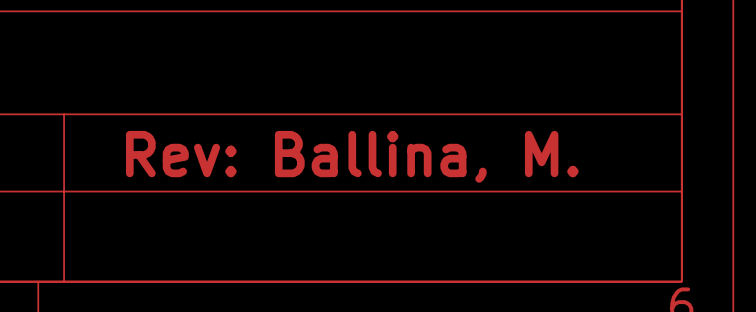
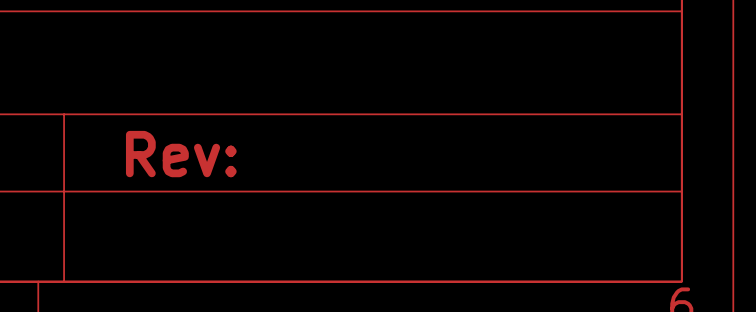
title block: Rev: Ballina, M. (352, 156) -> Rev: (181, 154)

